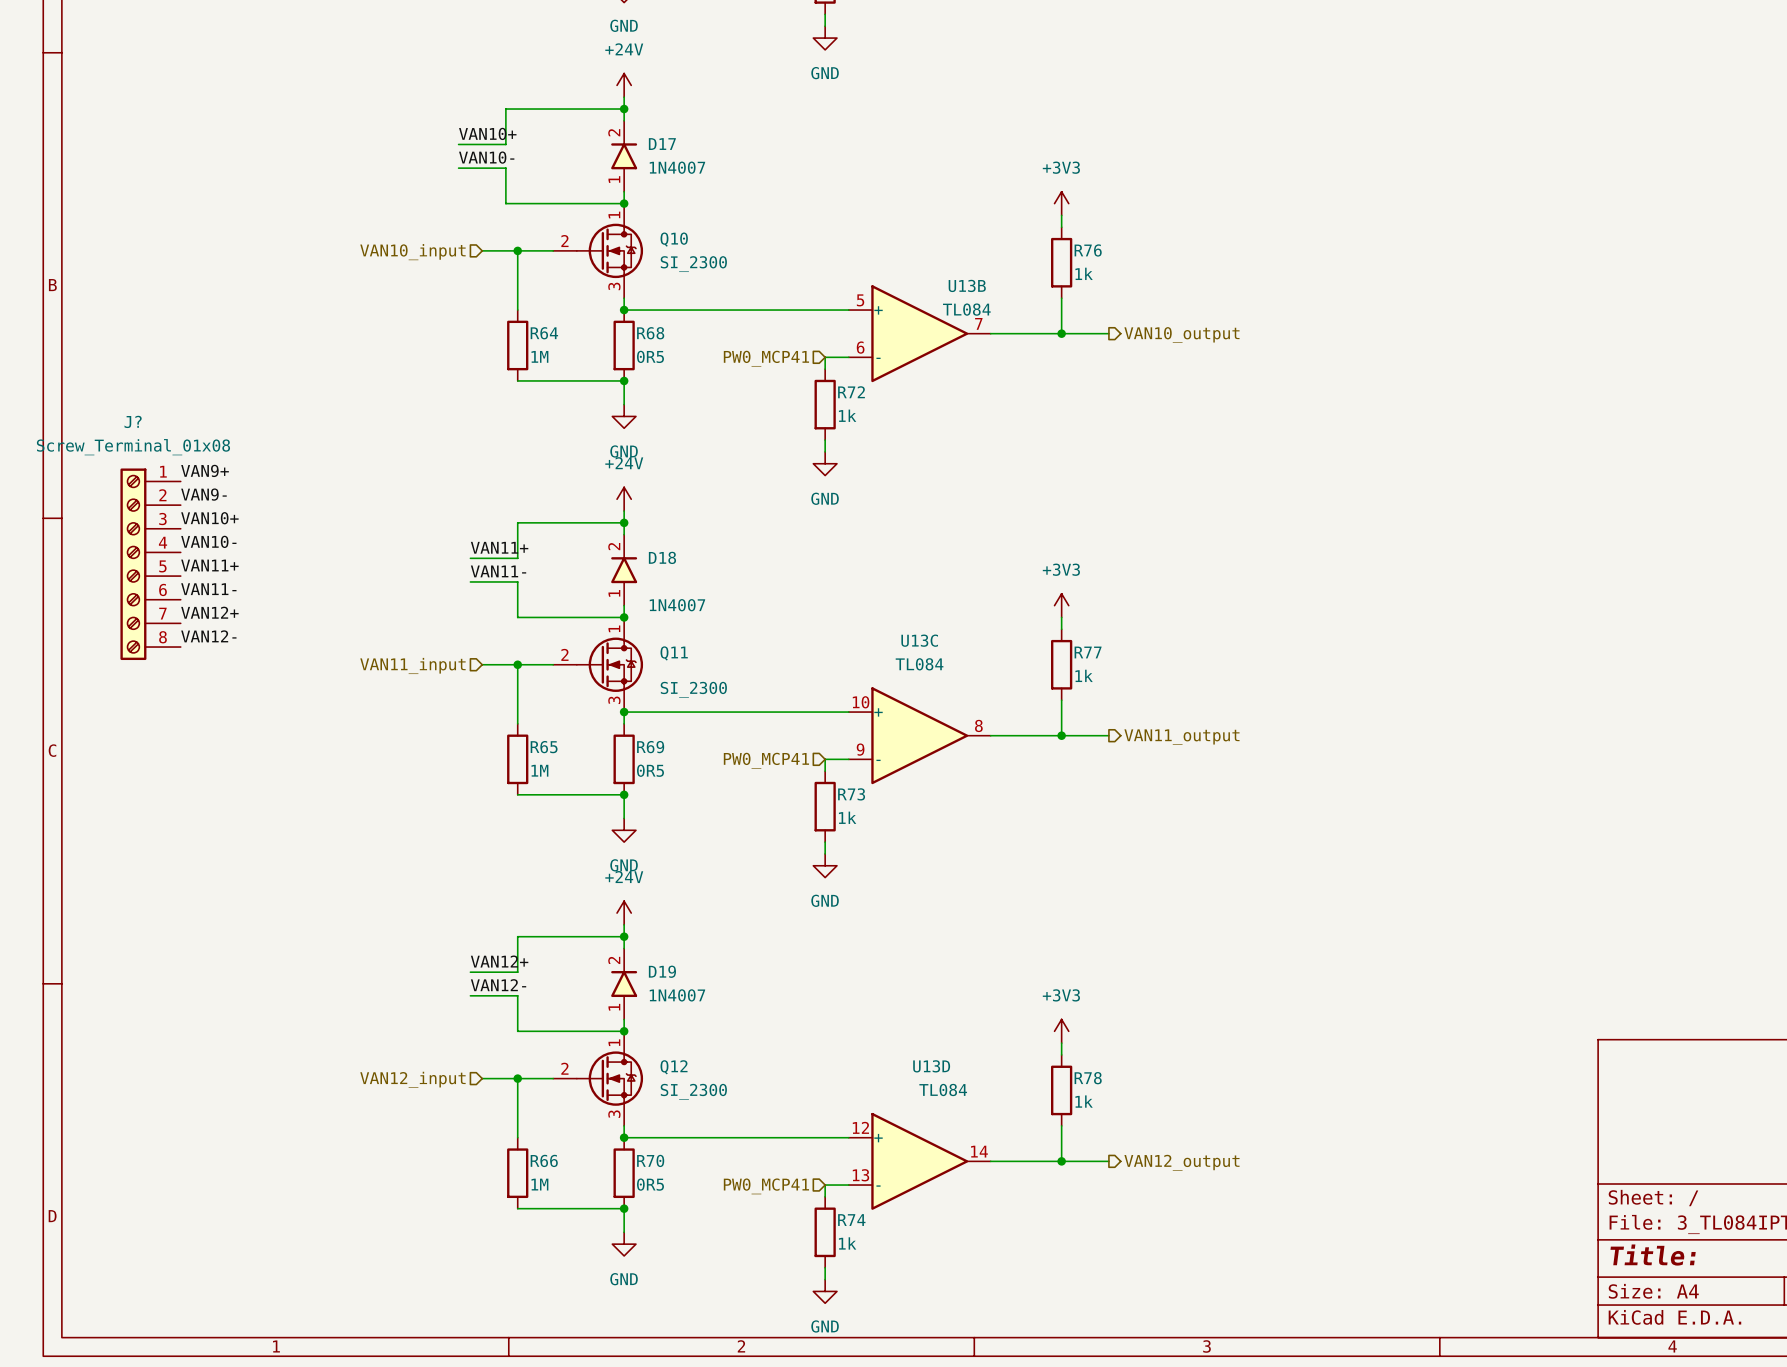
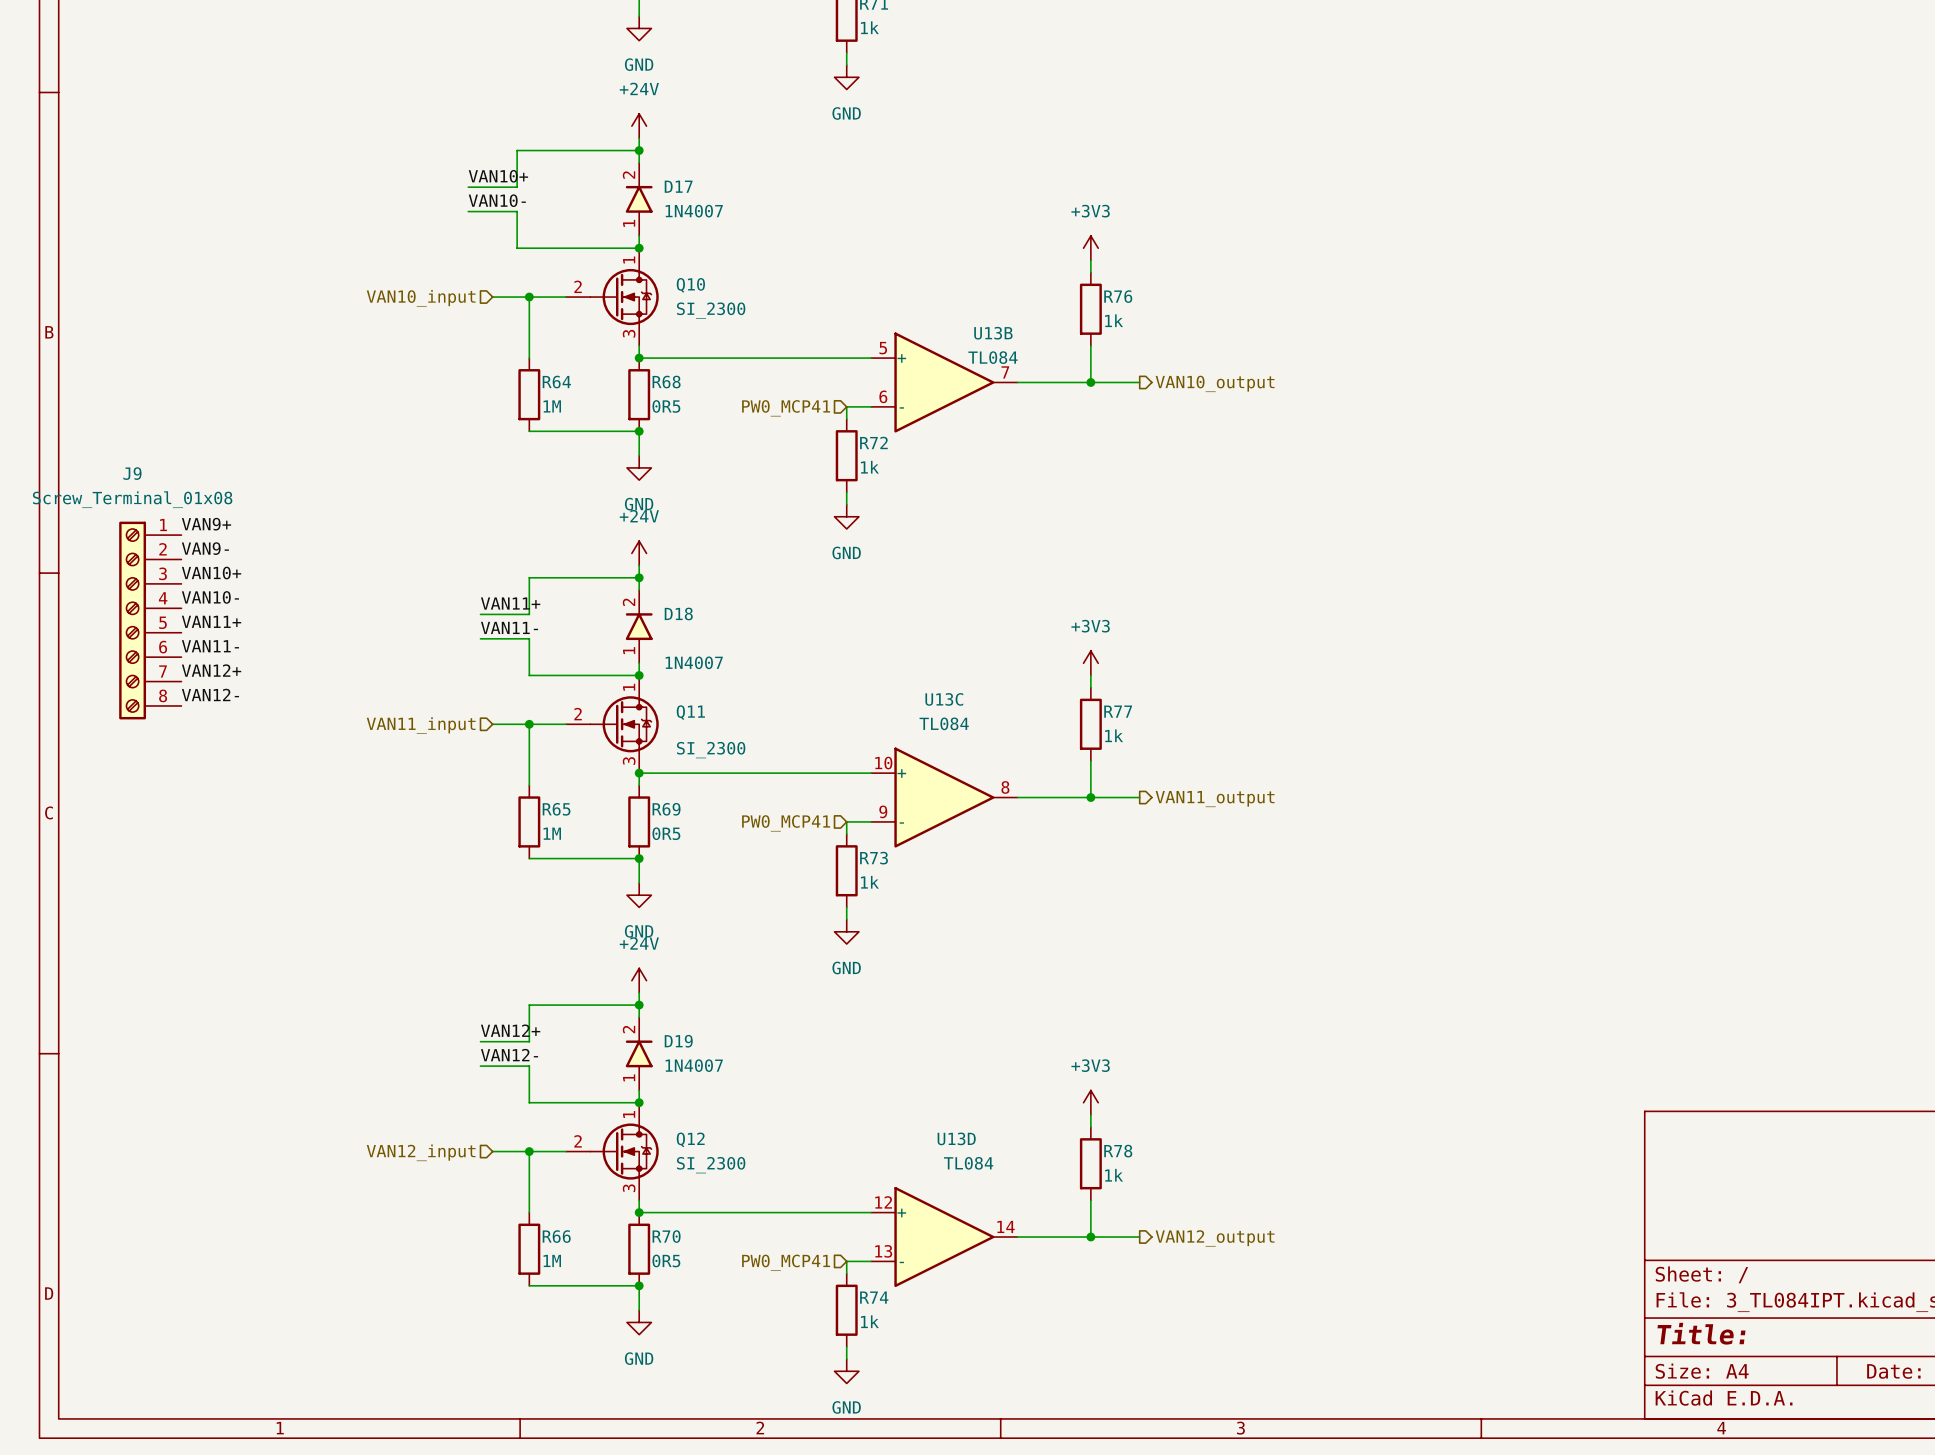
J? name: J? (133, 421) -> J9 (132, 473)

